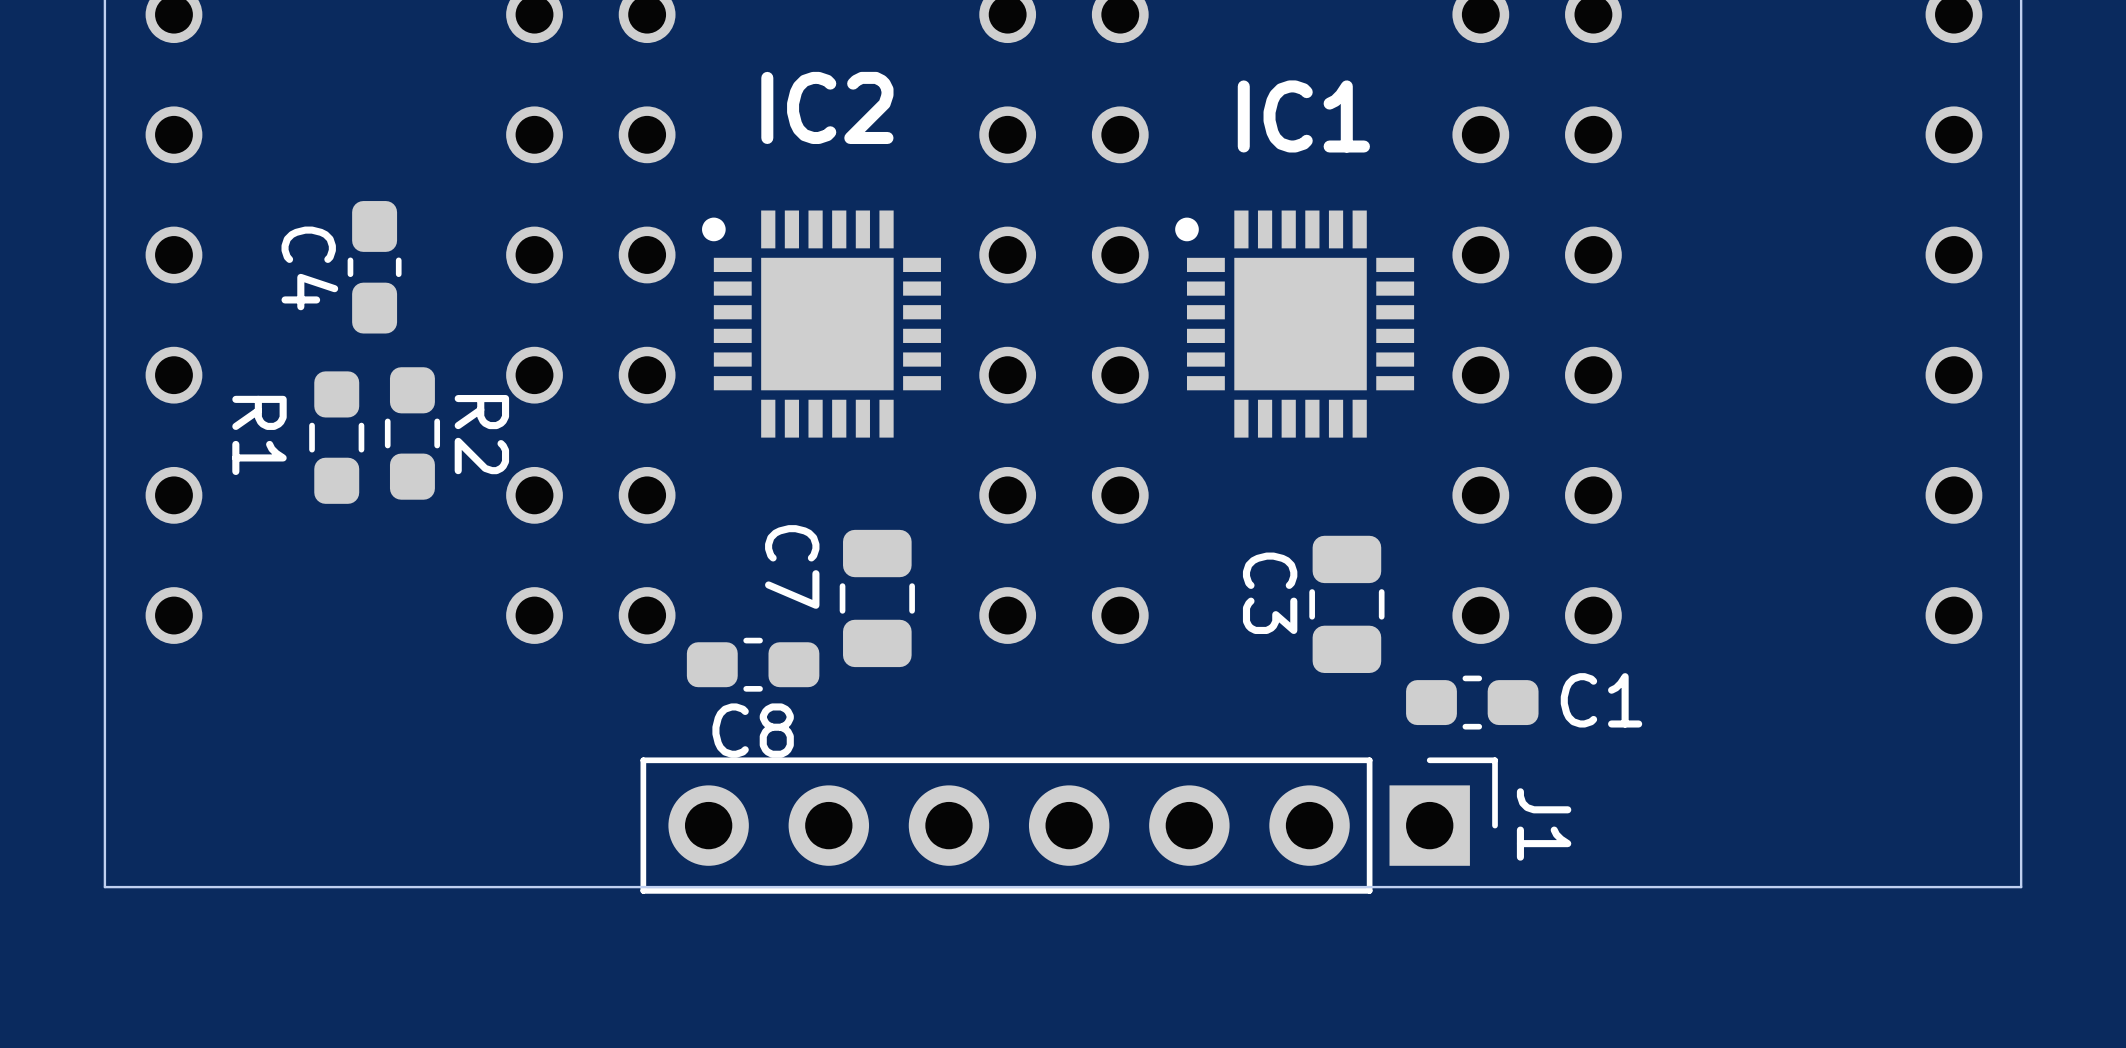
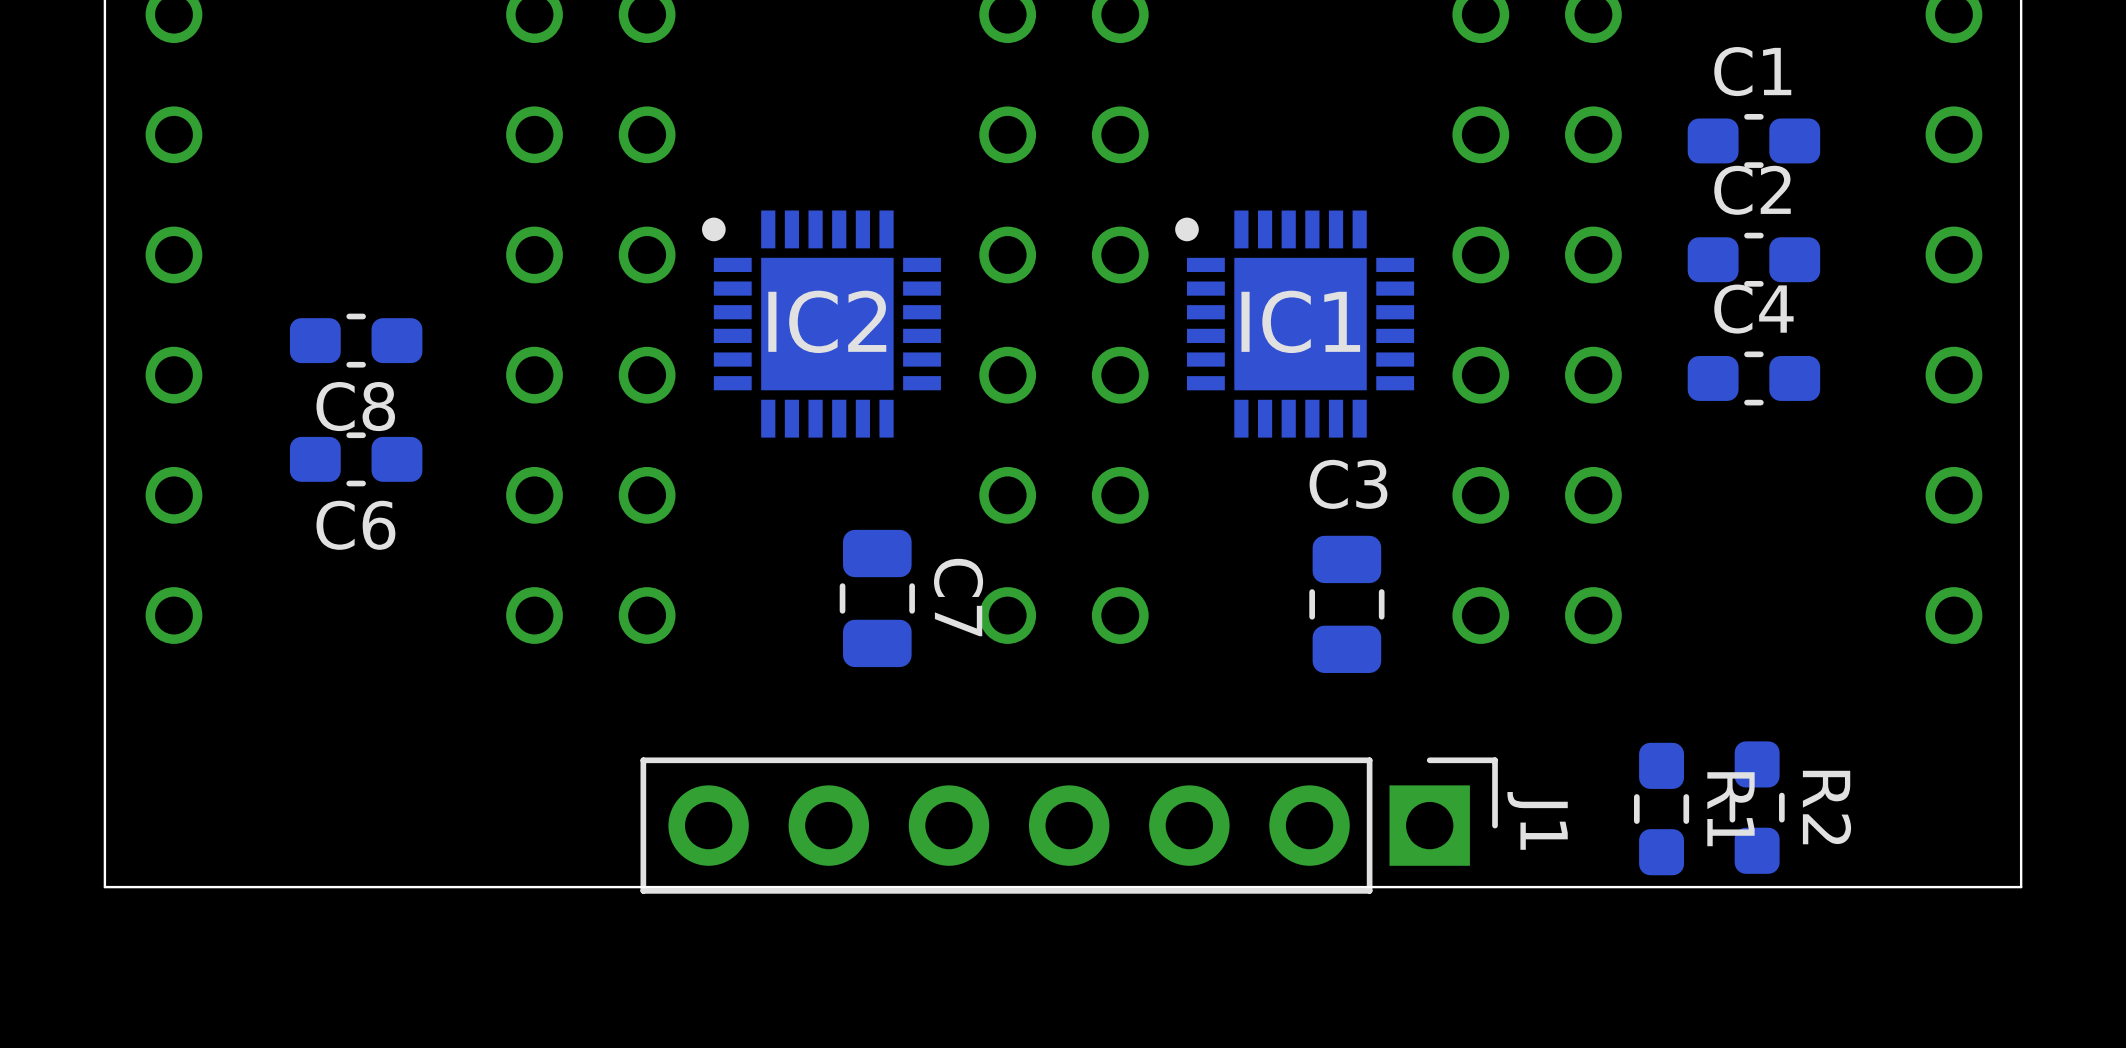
IC2 name position: IC2 (827, 107) -> IC2 (827, 321)
IC1 name position: IC1 (1303, 116) -> IC1 (1300, 321)
C2: none -> (1753, 259)
C4 rotation: 0° (374, 267) -> 90° clockwise (1753, 378)
C4 position: (374, 267) -> (1753, 378)
R2 position: (412, 433) -> (1757, 807)
R1 name position: R1 (259, 435) -> R1 (1730, 809)
R1 position: (336, 437) -> (1661, 809)
C6: none -> (356, 459)
C7 name position: C7 (792, 566) -> C7 (958, 597)
C3 name rotation: 0° (1270, 593) -> 90° counterclockwise (1348, 484)
C3 name position: C3 (1270, 593) -> C3 (1348, 484)
C8 position: (753, 664) -> (356, 340)
C1 name position: C1 (1601, 700) -> C1 (1752, 71)
C1 position: (1472, 702) -> (1753, 140)

